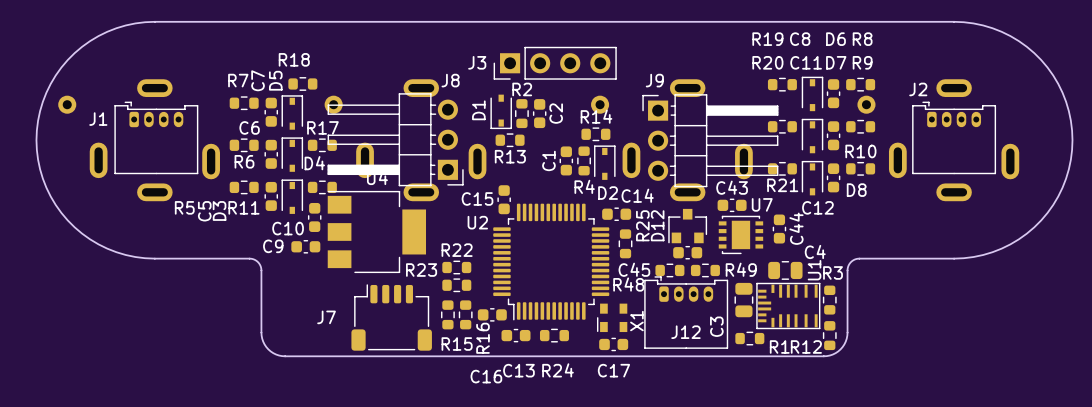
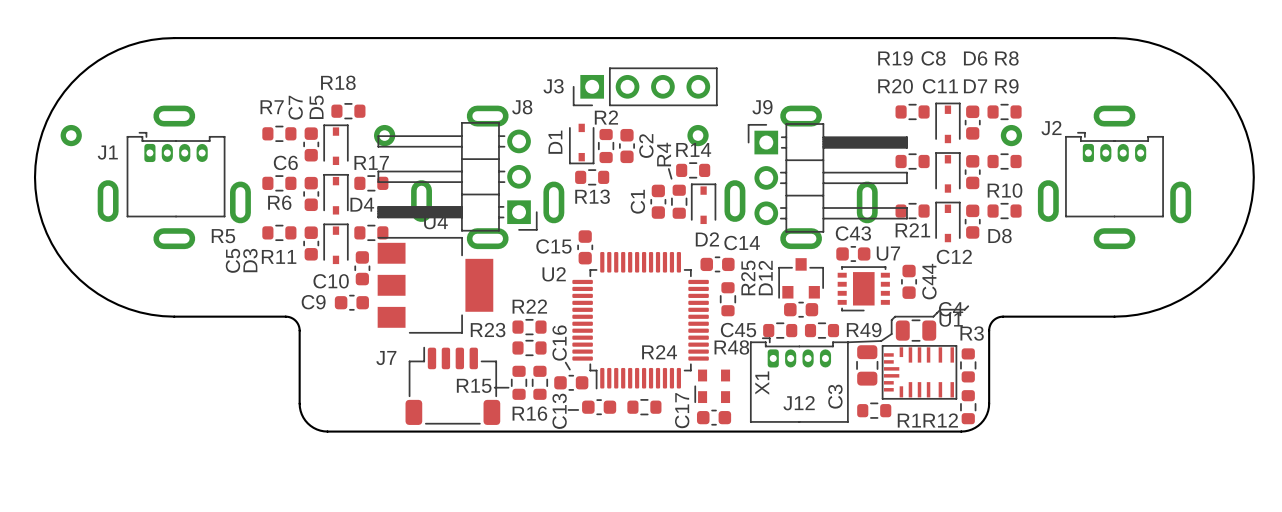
J2 name position: J2 (918, 89) -> J2 (1051, 128)
line: none -> (668, 169) (671, 178)
R4 name rotation: 0° (584, 186) -> 90° counterclockwise (664, 154)
R4 name position: R4 (584, 186) -> R4 (664, 154)
R5 name position: R5 (184, 207) -> R5 (223, 236)
line: none -> (968, 306) (964, 309) (940, 309) (933, 316) (895, 316) (891, 320) (891, 334) (881, 341) (847, 342)
U1 name rotation: 0° (814, 270) -> 90° clockwise (951, 319)
line: none -> (565, 362) (569, 369)
J7 name position: J7 (326, 317) -> J7 (386, 358)
line: none -> (494, 387) (508, 387)
X1 name position: X1 (636, 321) -> X1 (762, 383)
line: none -> (568, 409) (578, 409)
R16 name rotation: 0° (482, 338) -> 90° clockwise (529, 413)
R15 name position: R15 (457, 344) -> R15 (474, 385)
C13 name rotation: 0° (518, 370) -> 90° counterclockwise (559, 411)
C13 name position: C13 (518, 370) -> C13 (559, 411)
R24 name position: R24 (558, 370) -> R24 (659, 352)
C17 name rotation: 0° (613, 370) -> 90° counterclockwise (682, 410)
C17 name position: C17 (613, 370) -> C17 (682, 410)
C16 name rotation: 0° (486, 376) -> 90° counterclockwise (559, 343)
C16 name position: C16 (486, 376) -> C16 (559, 343)

